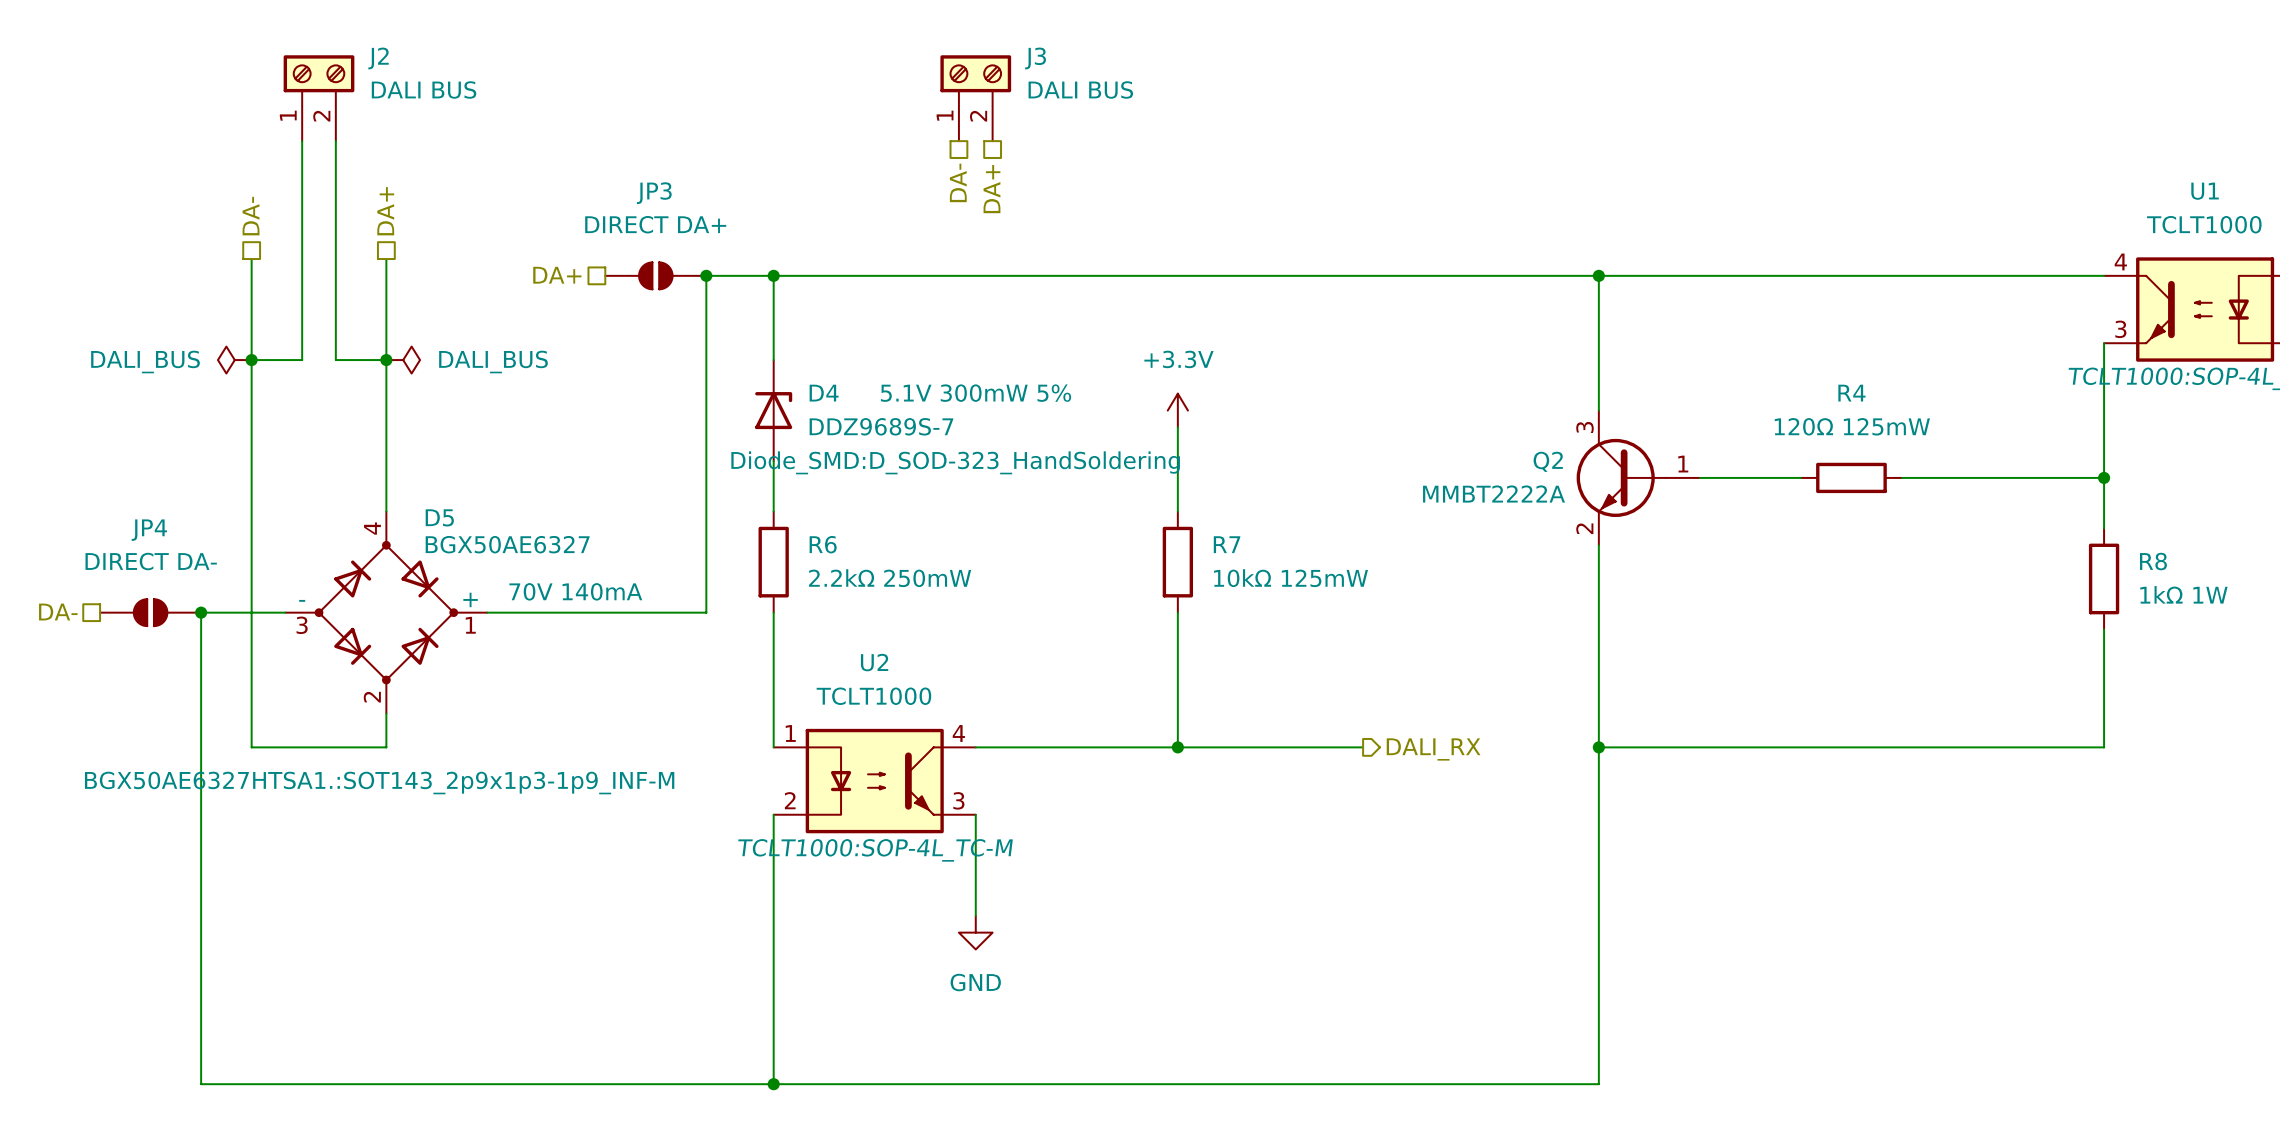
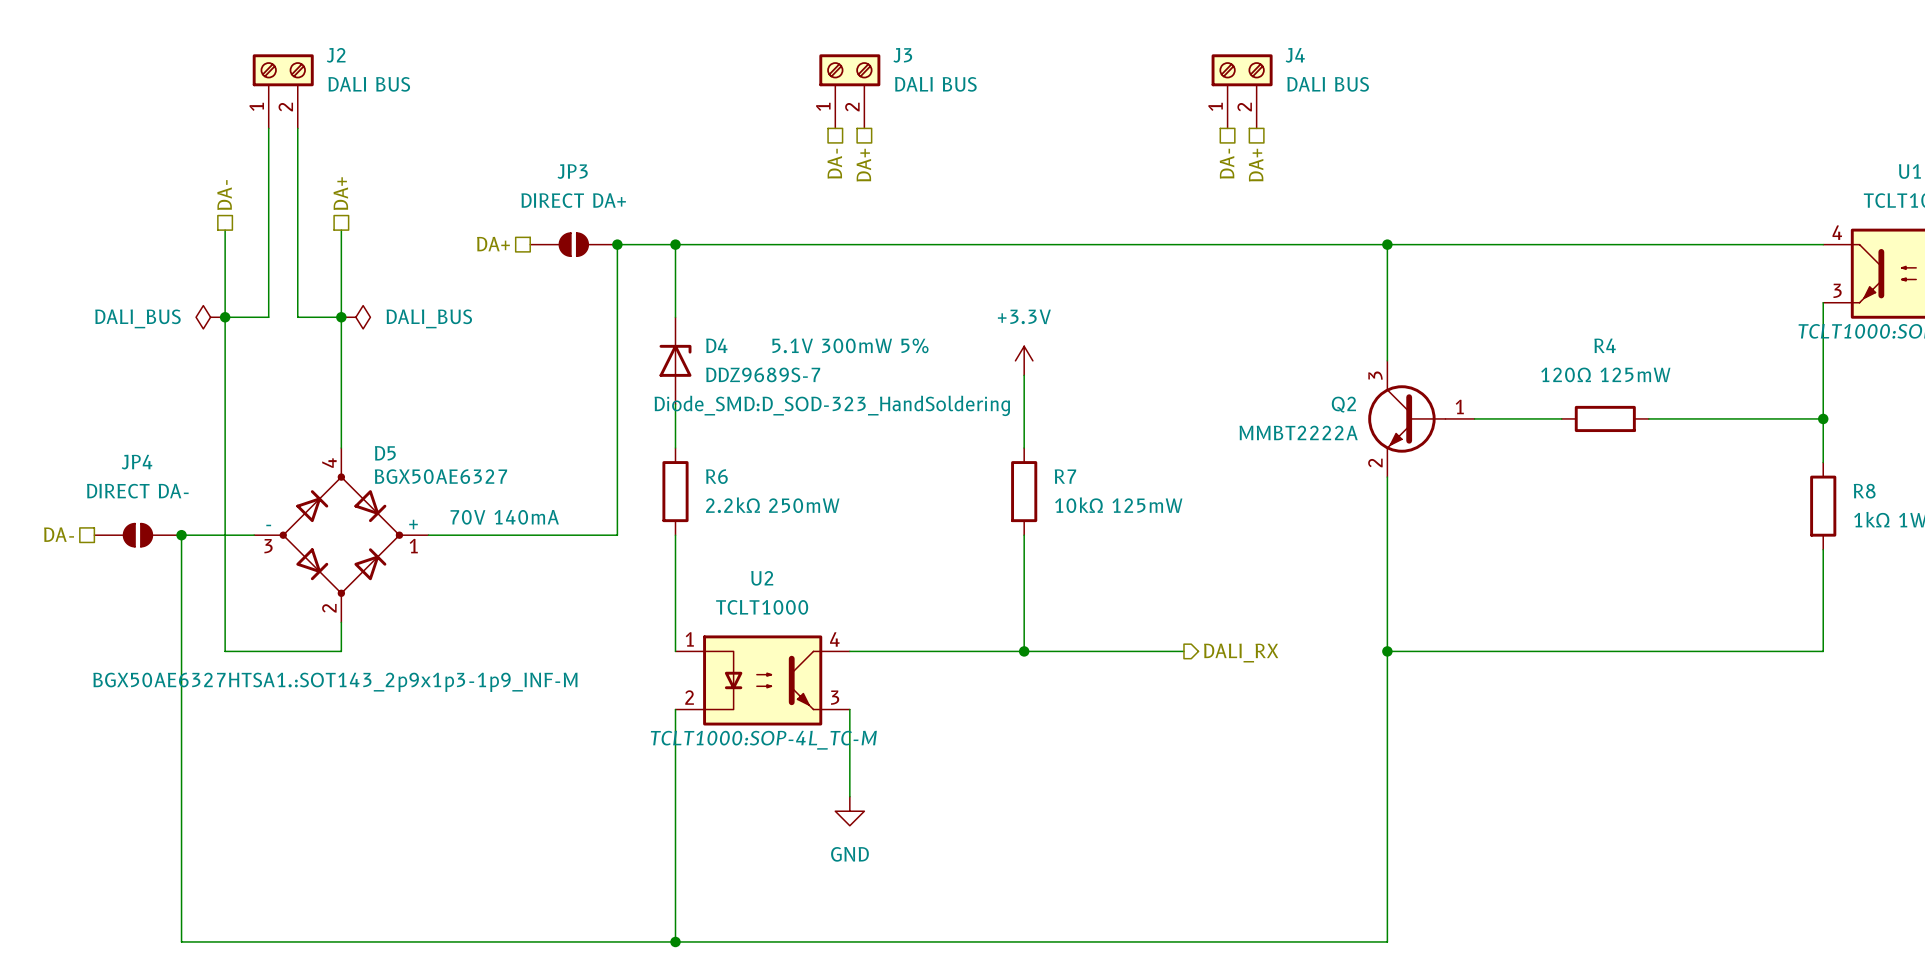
J4: none -> DALI BUS (1242, 91)
hierarchical label: none -> DA- (1227, 163)
hierarchical label: none -> DA+ (1256, 165)

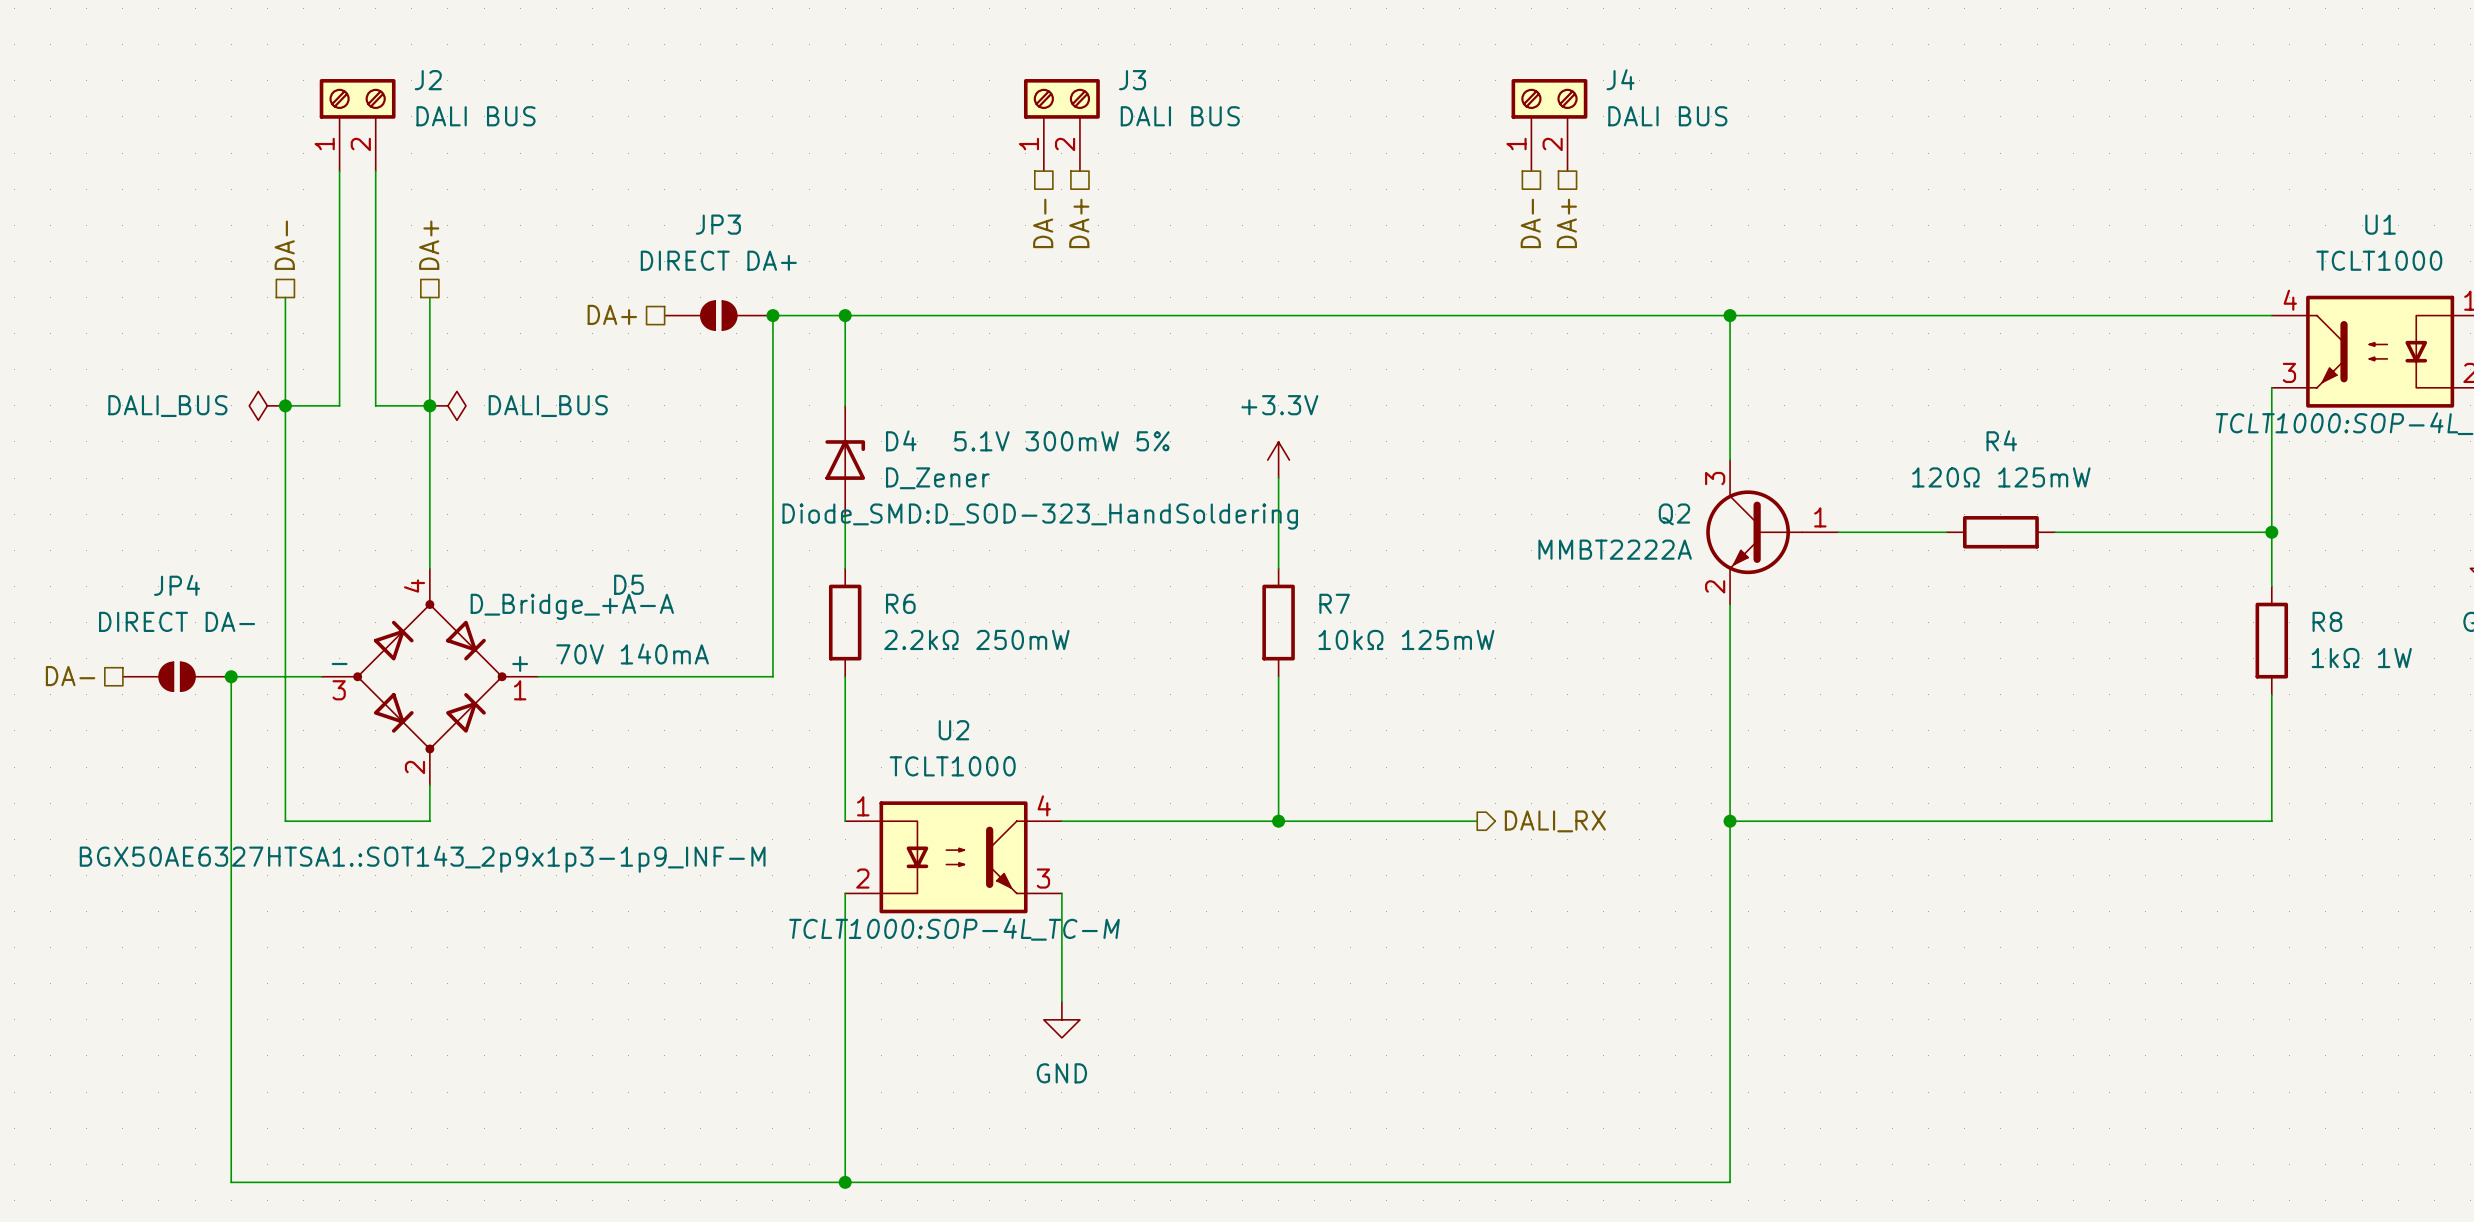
D4 value: DDZ9689S-7 (763, 374) -> D_Zener (937, 478)
D5 name position: D5 (385, 453) -> D5 (628, 584)
D5 value: BGX50AE6327 (440, 476) -> D_Bridge_+A-A (572, 606)

